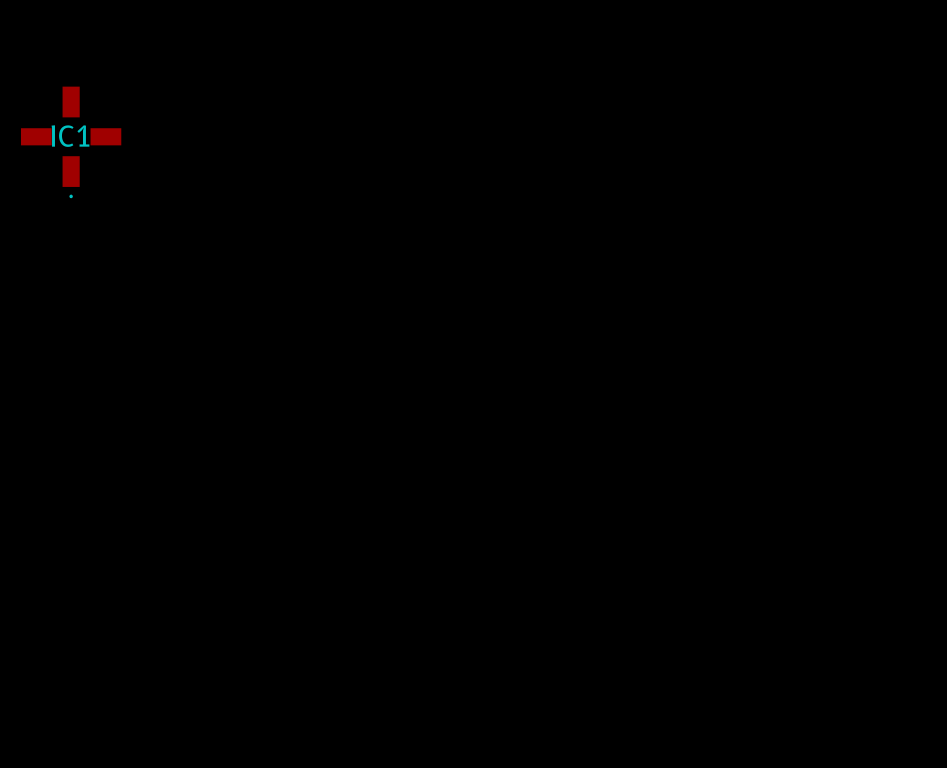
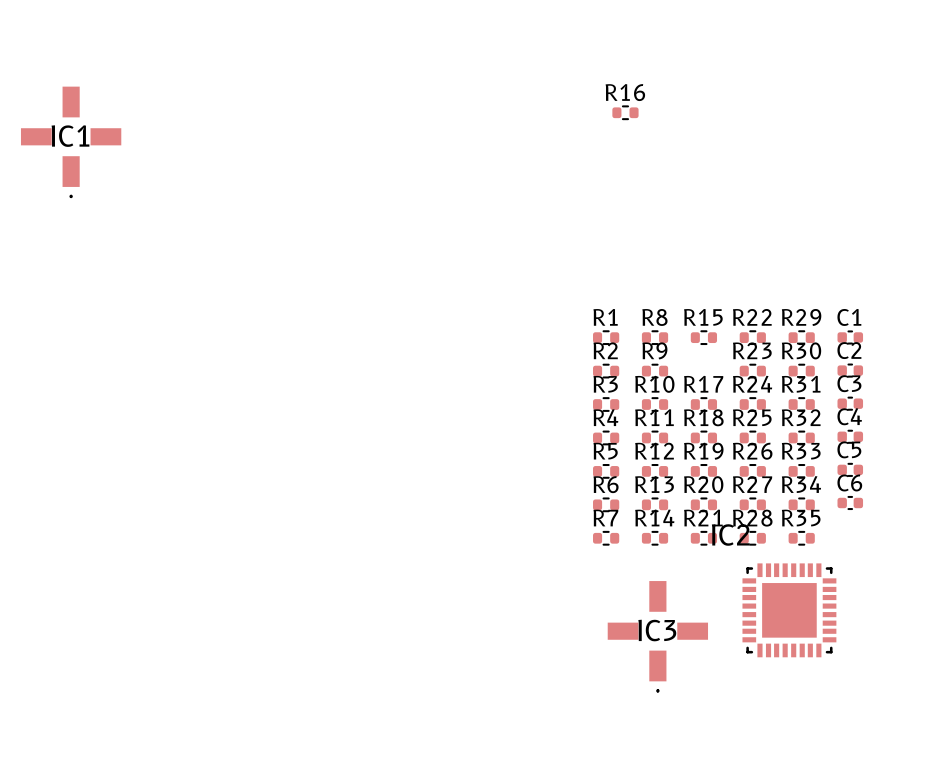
R16: none -> (625, 112)
R1: none -> (606, 337)
R8: none -> (655, 337)
R15: none -> (703, 337)
R22: none -> (752, 337)
R29: none -> (801, 337)
C1: none -> (850, 337)
C2: none -> (850, 370)
R2: none -> (606, 371)
R9: none -> (655, 371)
R23: none -> (752, 371)
R30: none -> (801, 371)
C3: none -> (850, 403)
R3: none -> (606, 404)
R10: none -> (655, 404)
R17: none -> (703, 404)
R24: none -> (752, 404)
R31: none -> (801, 404)
C4: none -> (850, 436)
R4: none -> (606, 437)
R11: none -> (655, 437)
R18: none -> (703, 437)
R25: none -> (752, 437)
R32: none -> (801, 437)
C5: none -> (850, 469)
R5: none -> (606, 471)
R12: none -> (655, 471)
R19: none -> (703, 471)
R26: none -> (752, 471)
R33: none -> (801, 471)
C6: none -> (850, 502)
R6: none -> (606, 504)
R13: none -> (655, 504)
R20: none -> (703, 504)
R27: none -> (752, 504)
R34: none -> (801, 504)
R7: none -> (606, 538)
R14: none -> (655, 538)
R21: none -> (703, 538)
R28: none -> (752, 538)
R35: none -> (801, 538)
IC2: none -> (789, 610)
IC3: none -> (657, 636)

